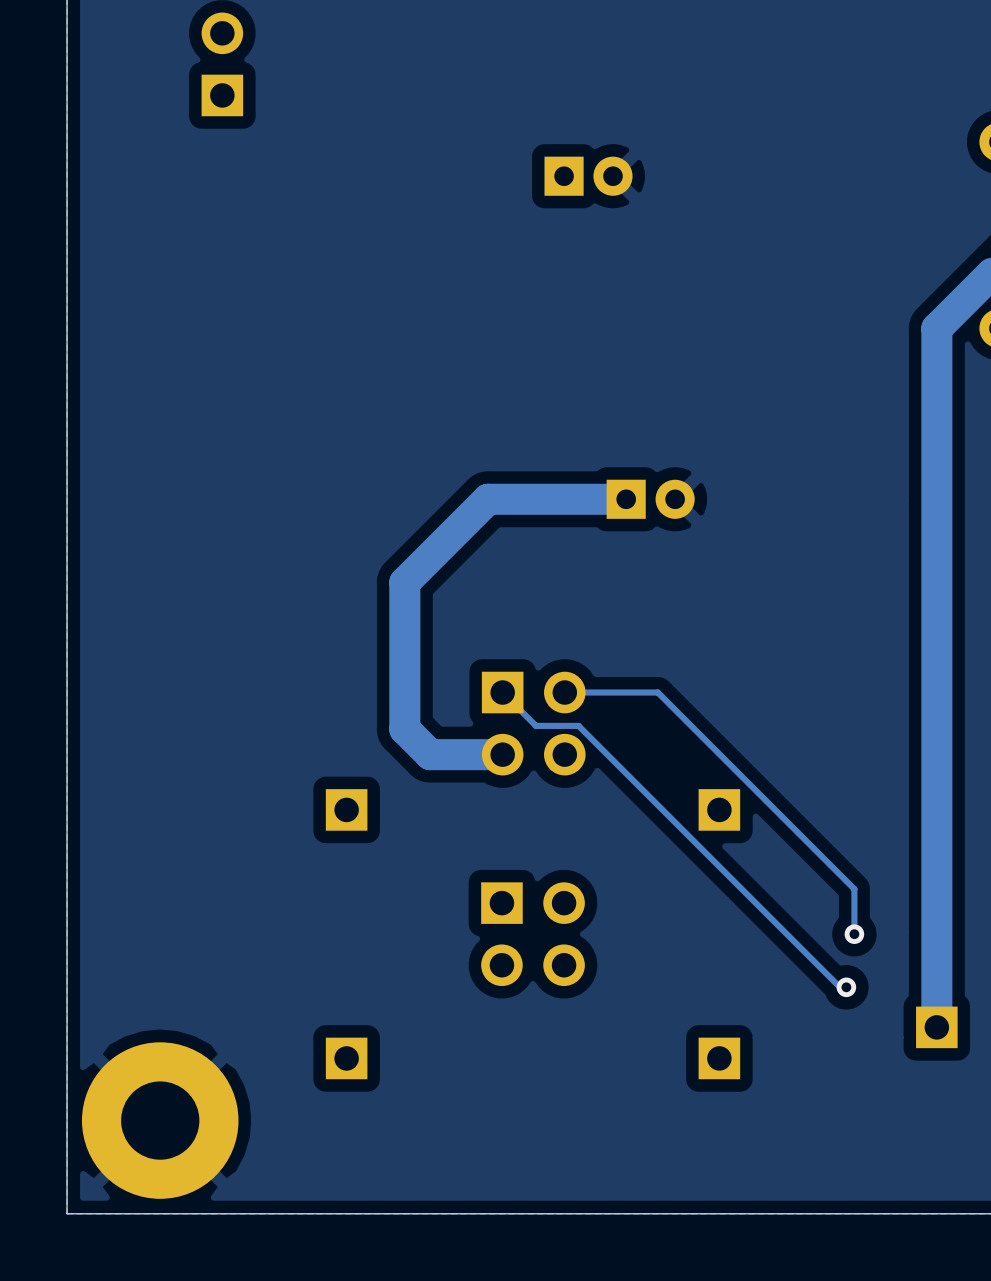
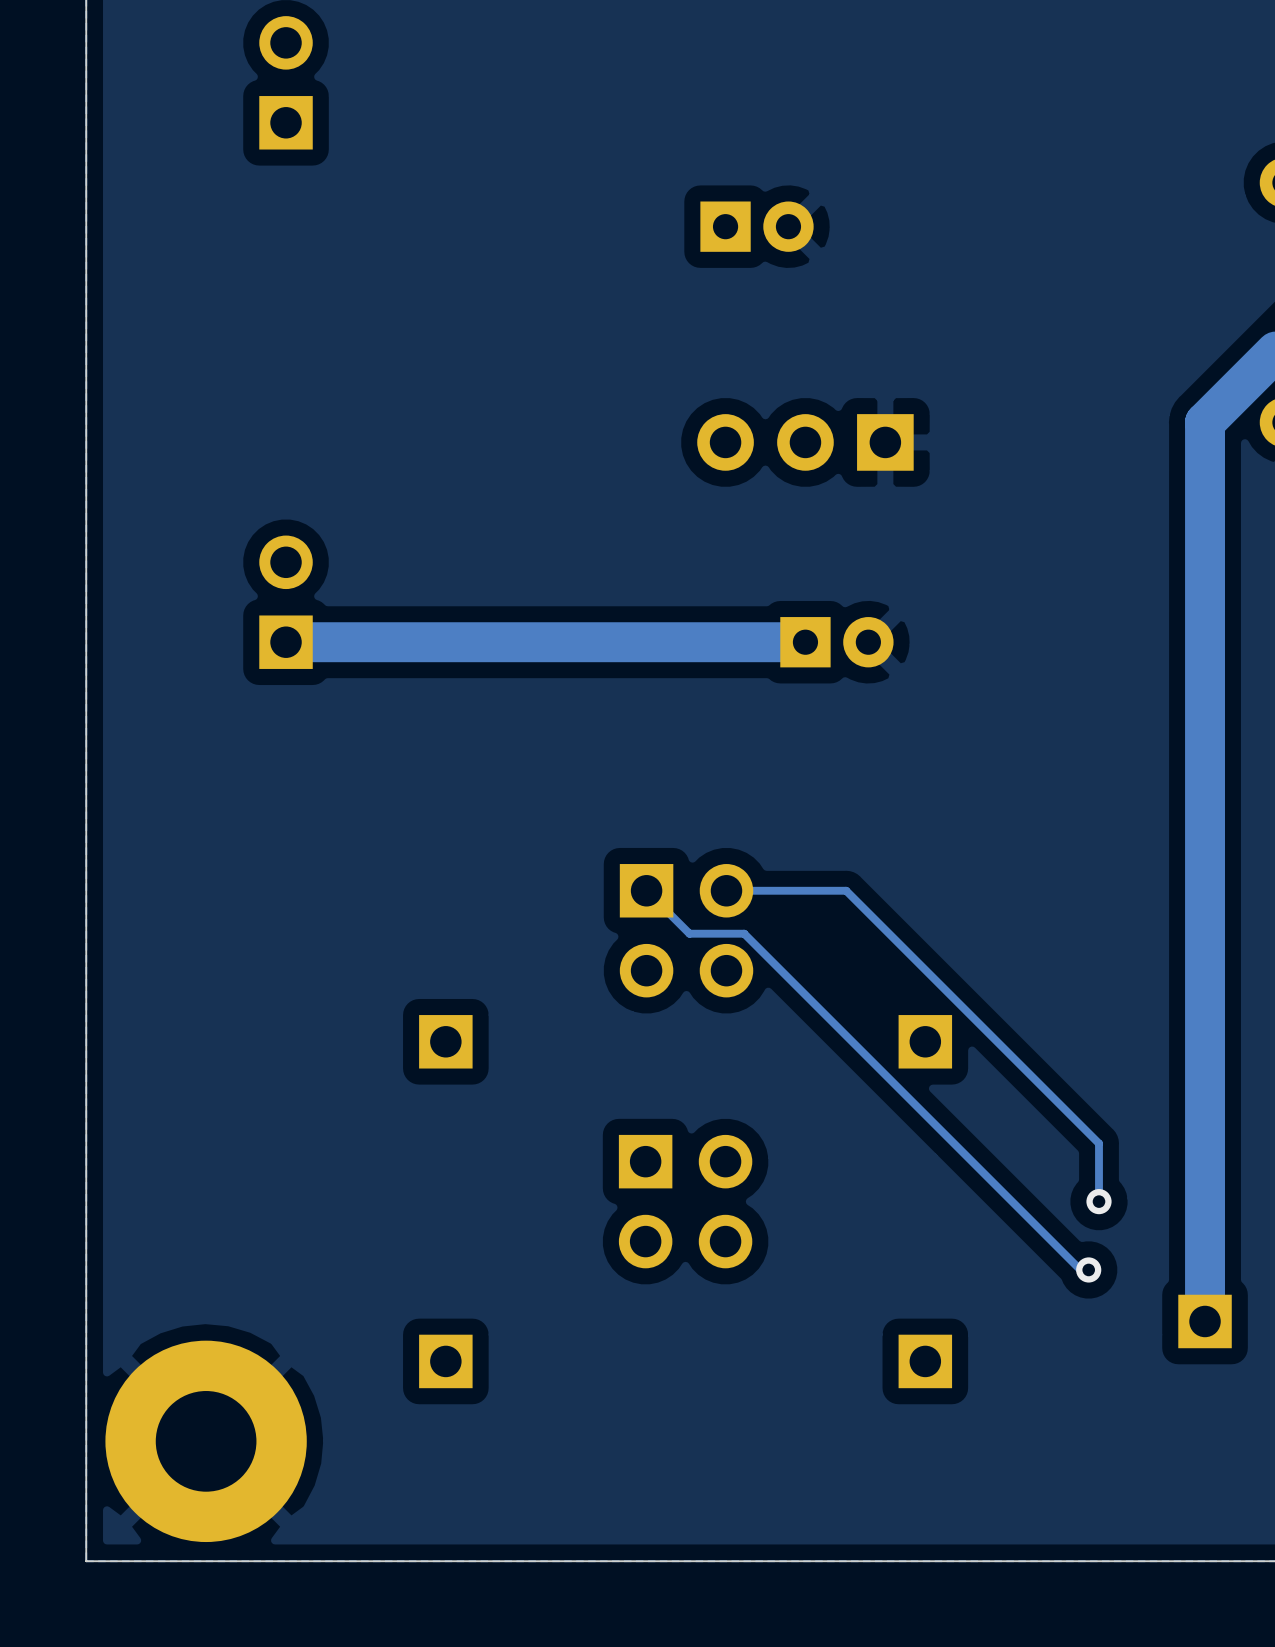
part: none -> (805, 442)
part: none -> (286, 602)
track: (488, 499) (404, 582) (404, 729) (430, 754) (502, 754) -> (627, 642) (286, 642)

